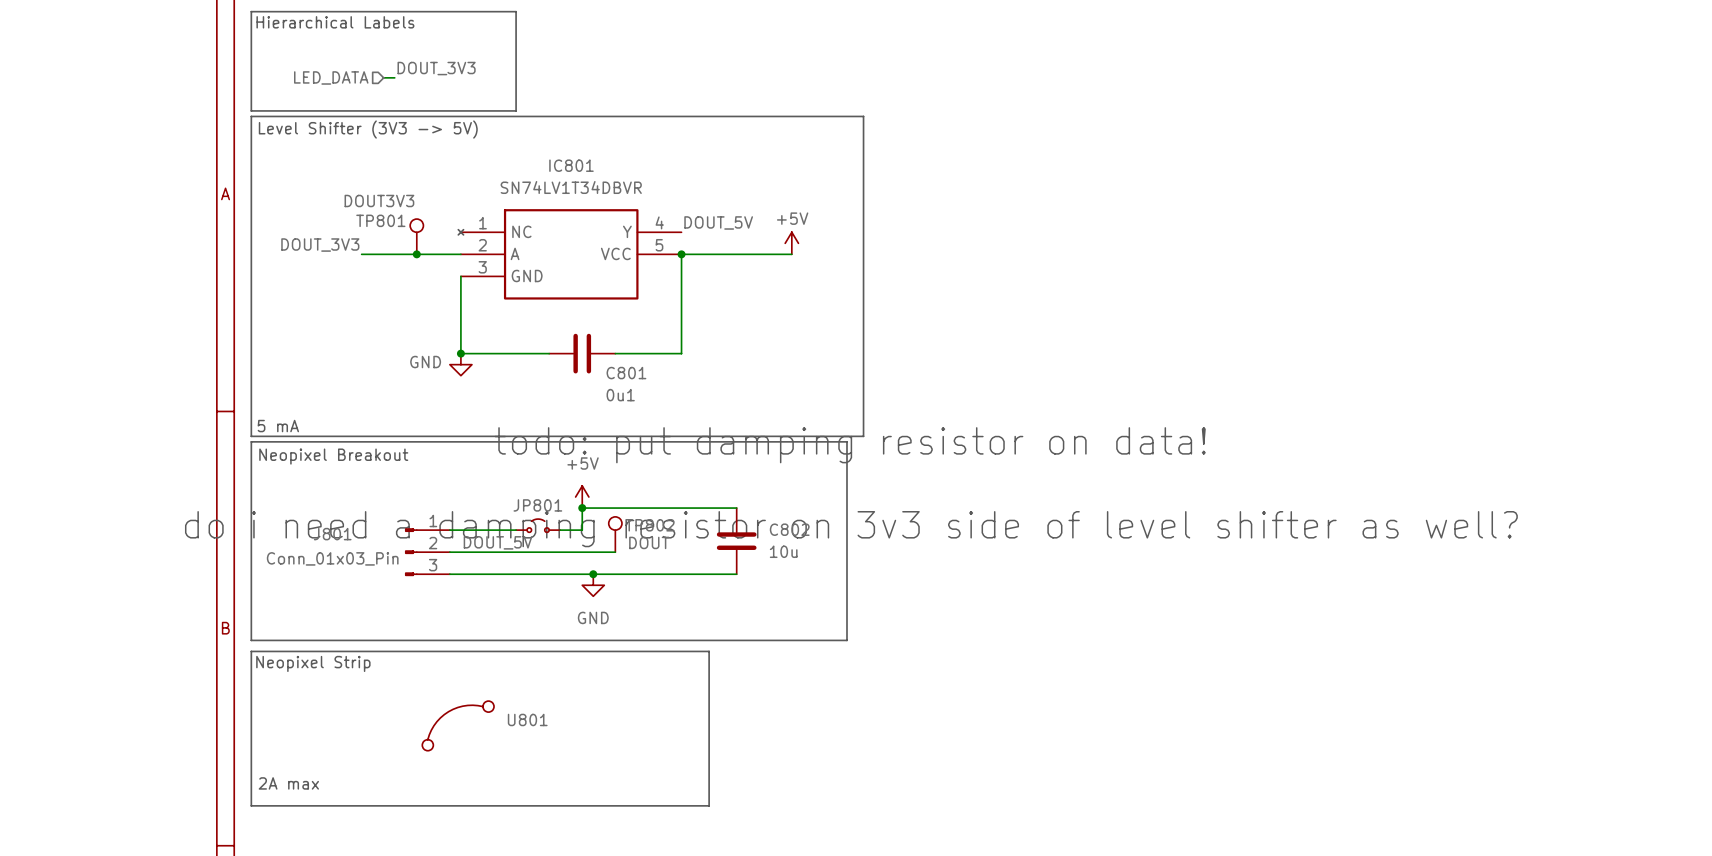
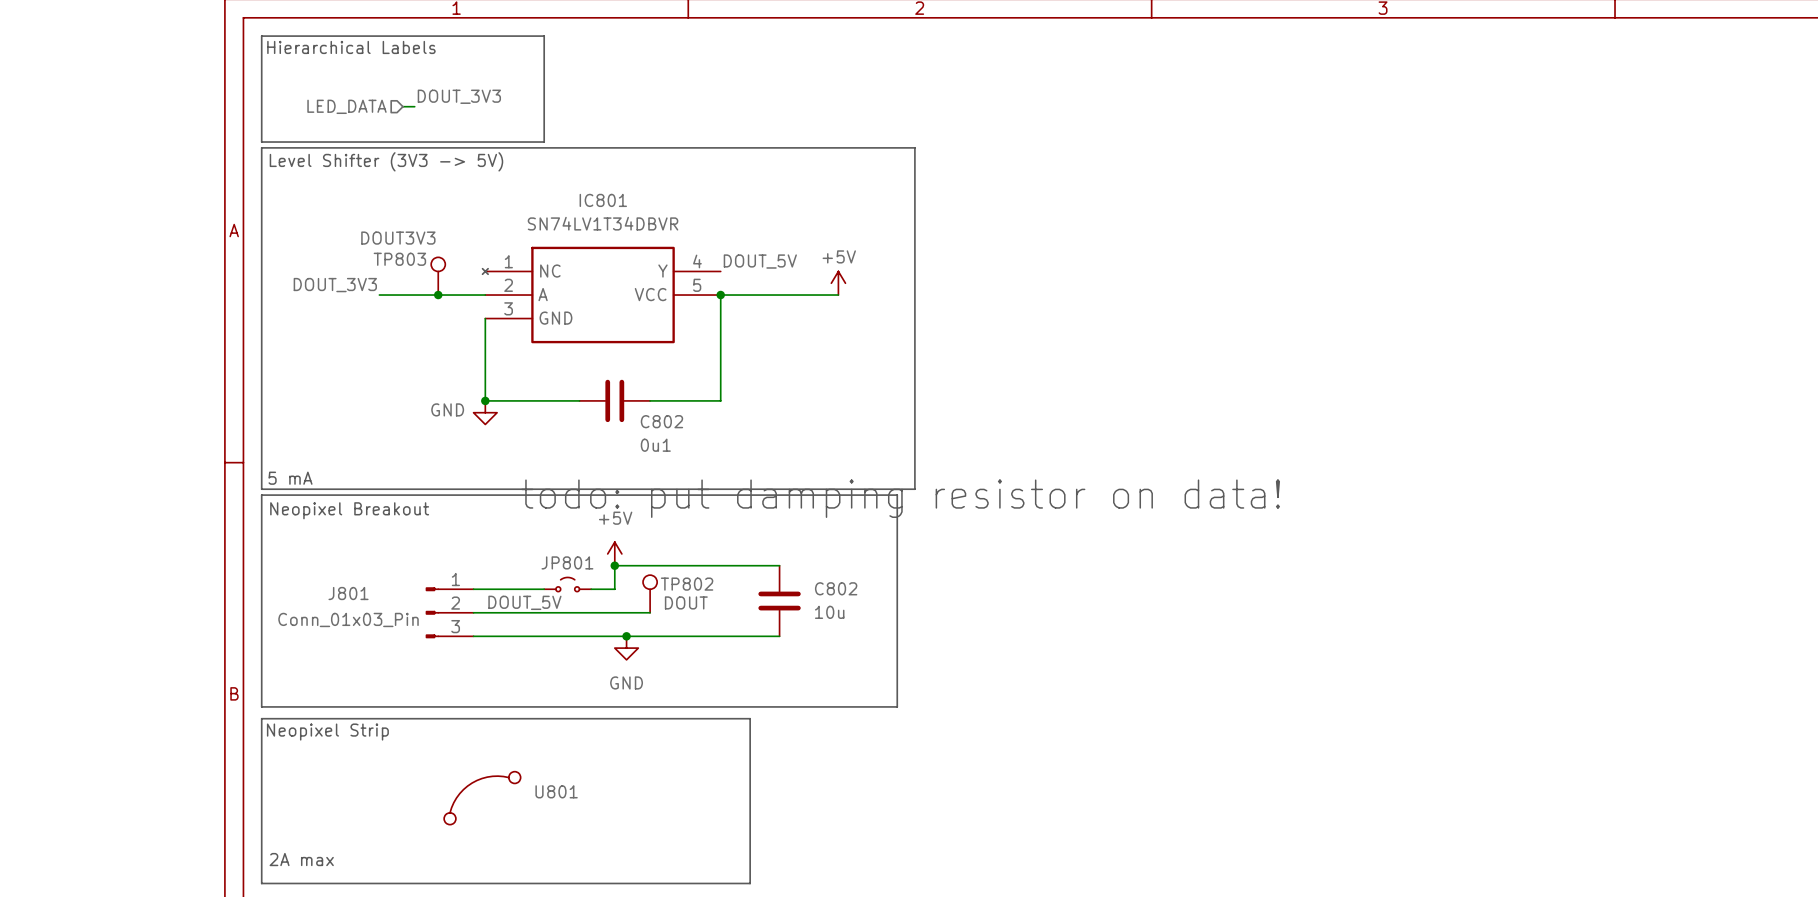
TP801 name: TP801 (380, 220) -> TP803 (399, 259)
C801 name: C801 (626, 373) -> C802 (661, 421)
text: do i need a damping resistor on 3v3 side of level shifter as well? (851, 529) -> none

